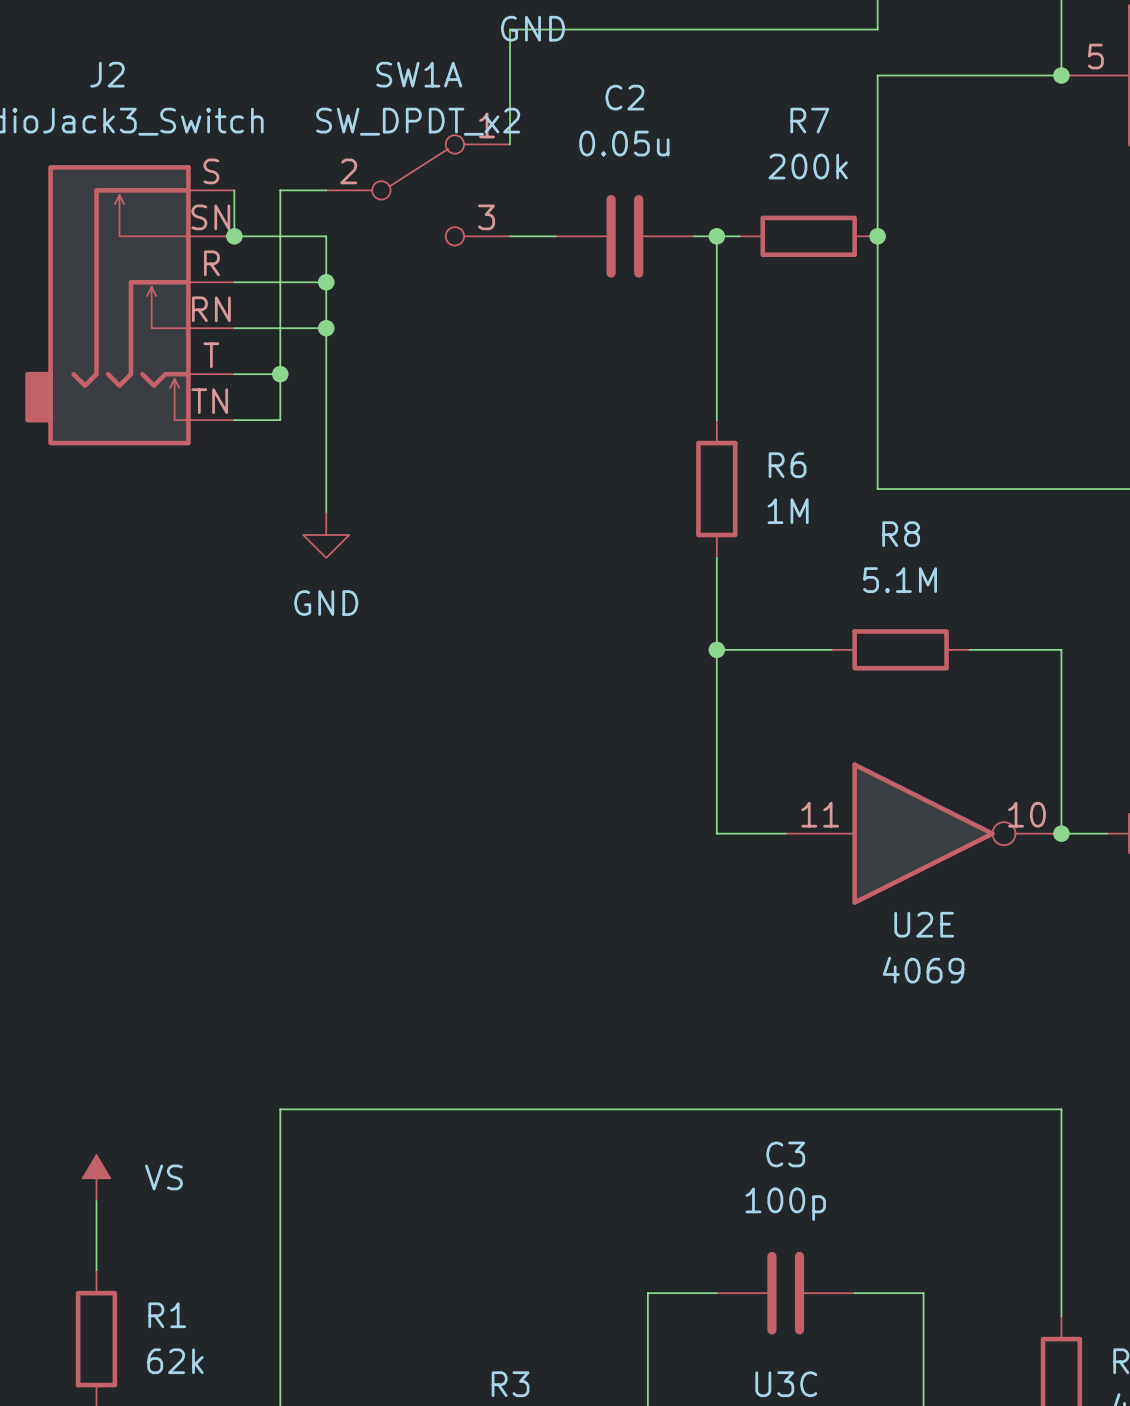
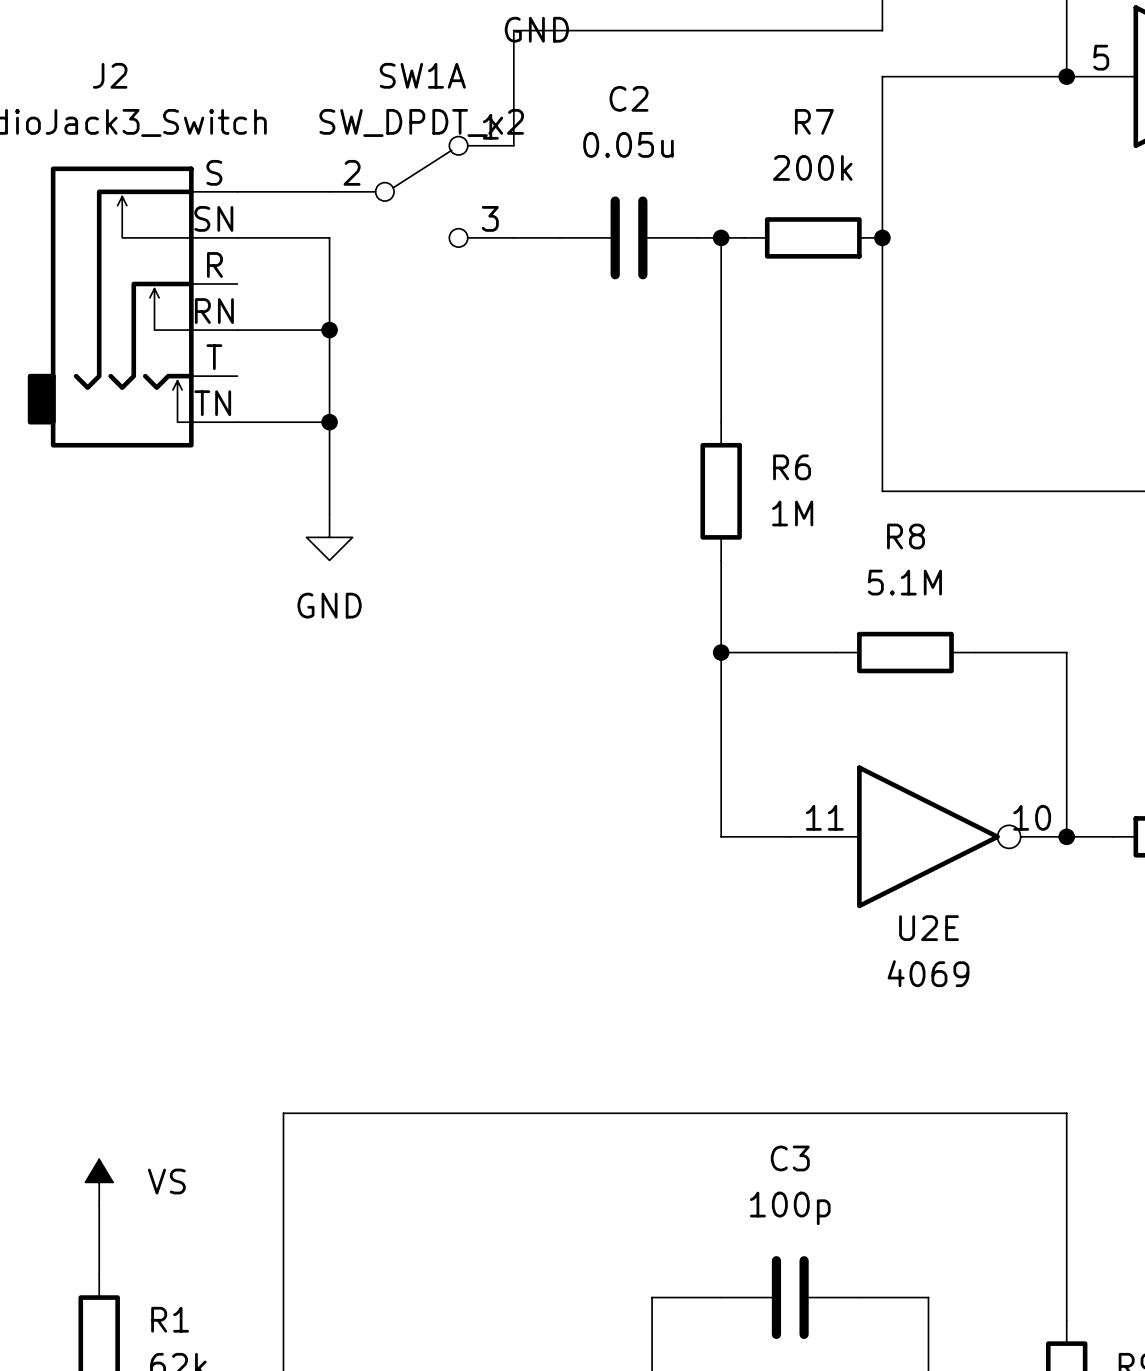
wire: (234, 190) (234, 236) -> (237, 191) (283, 191)
wire: (280, 190) (280, 420) -> (329, 422) (283, 422)
junction: (234, 236) -> none
wire: (234, 282) (326, 282) -> none
junction: (326, 282) -> none
wire: (234, 374) (280, 374) -> none
junction position: (280, 374) -> (329, 422)

